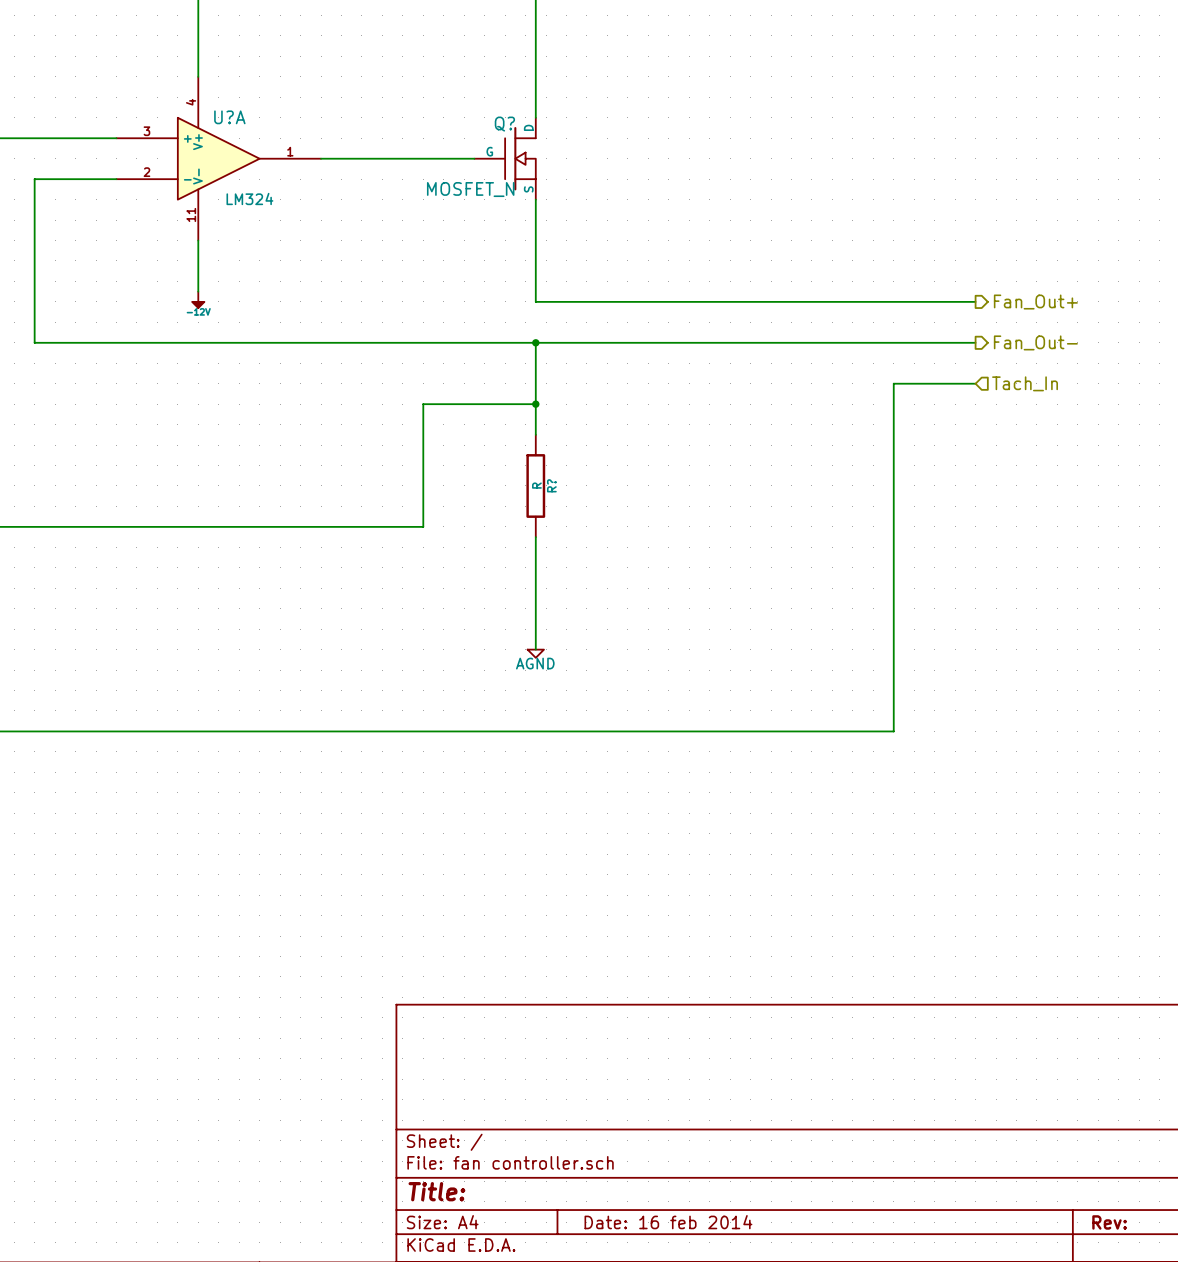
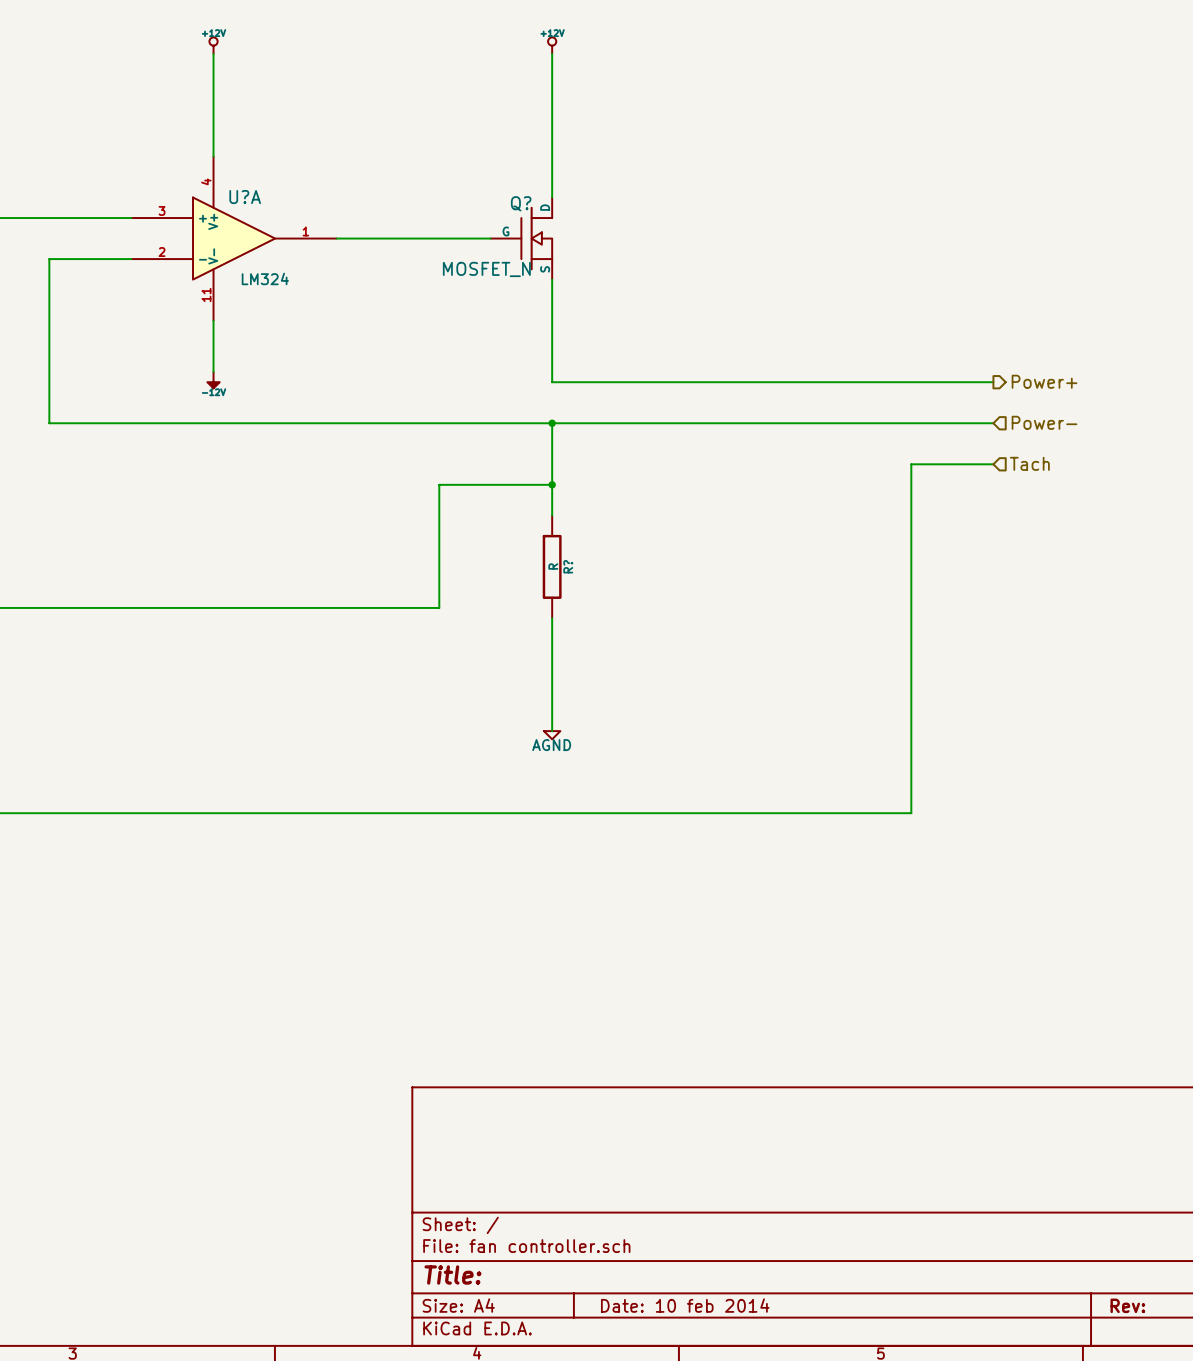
hierarchical label: Fan_Out+ (1035, 302) -> Power+ (1044, 381)
hierarchical label shape: output (1035, 342) -> input (1044, 422)
hierarchical label: Fan_Out- (1035, 342) -> Power- (1044, 422)
hierarchical label: Tach_In (1025, 383) -> Tach (1029, 463)
title block: Date: 16 feb 2014 (668, 1222) -> Date: 10 feb 2014 (685, 1305)

